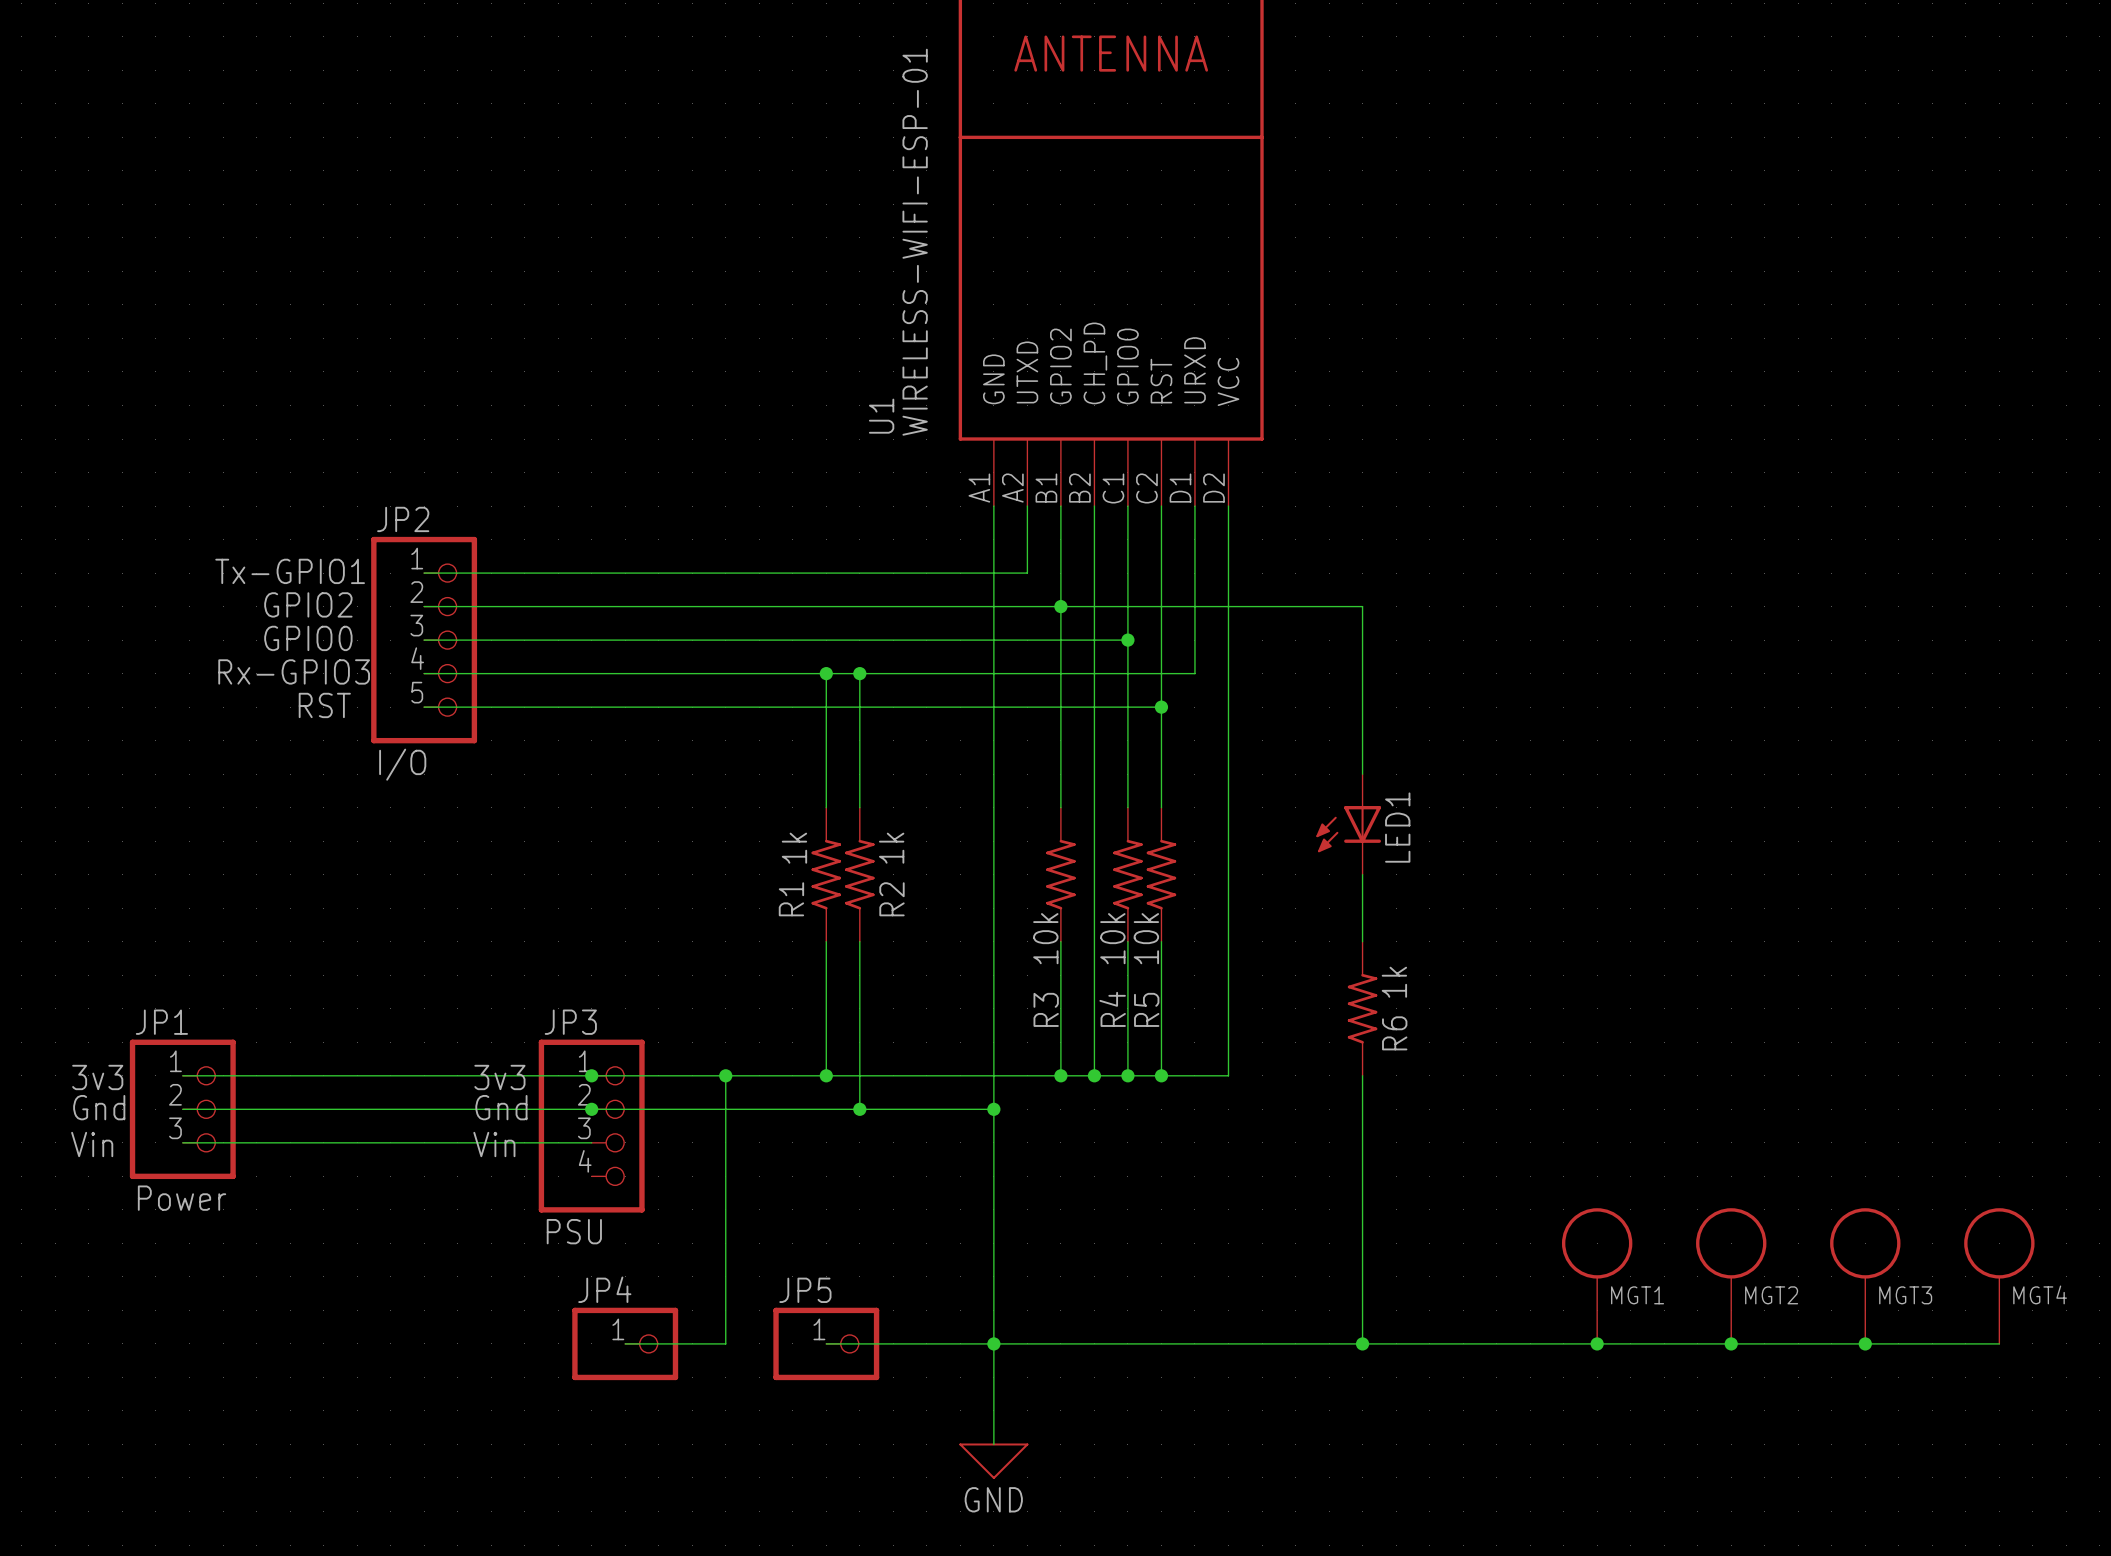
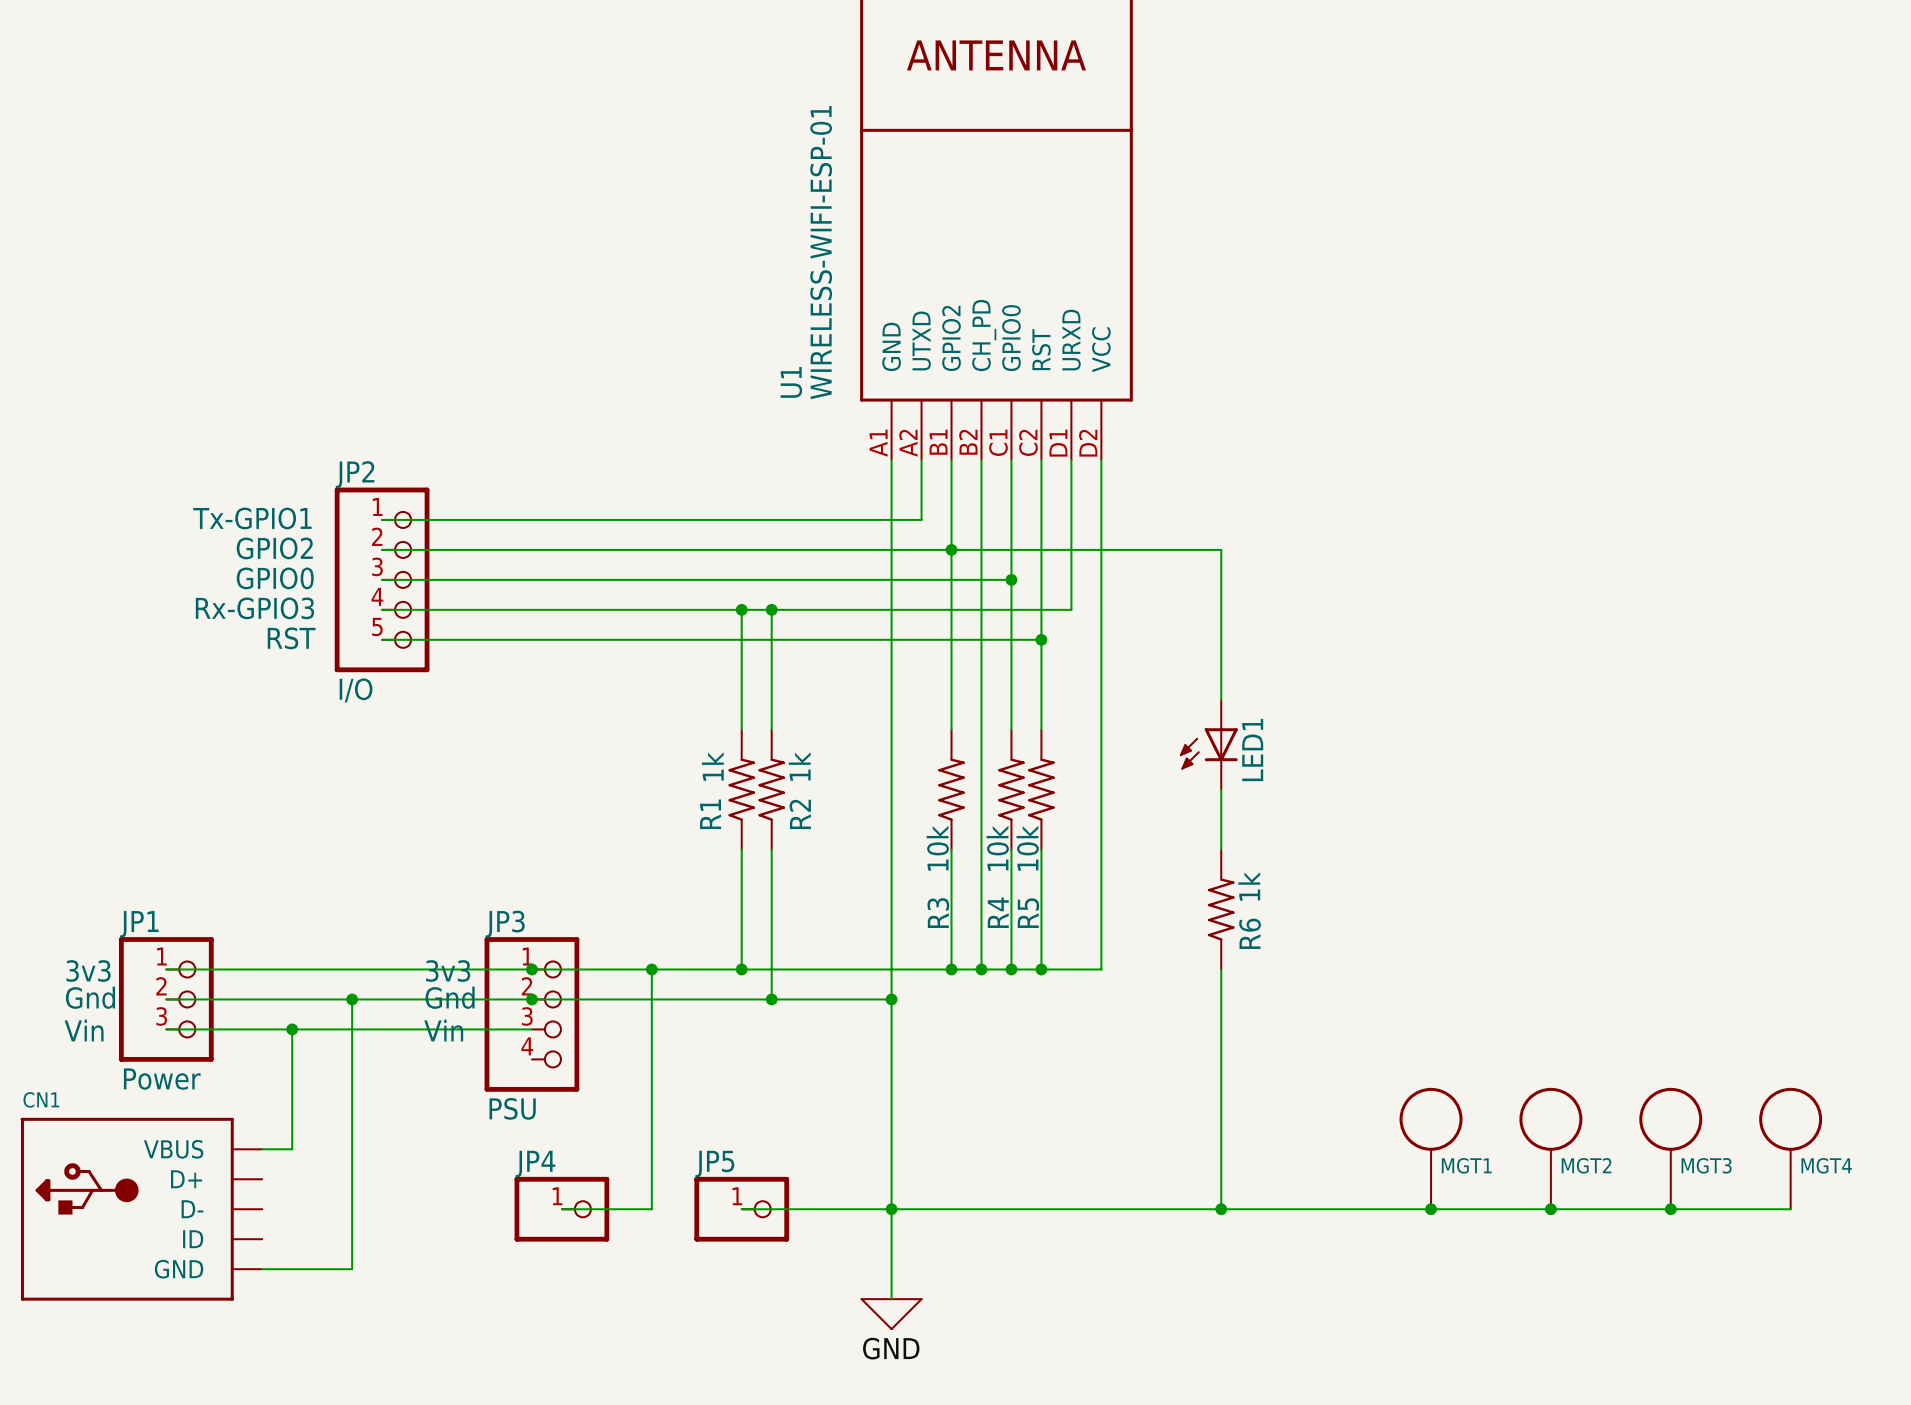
wire: none -> (352, 999) (352, 1269) (262, 1269)
junction: none -> (352, 999)
wire: none -> (292, 1029) (292, 1149) (262, 1149)
junction: none -> (292, 1029)
CN1: none -> (141, 1209)

